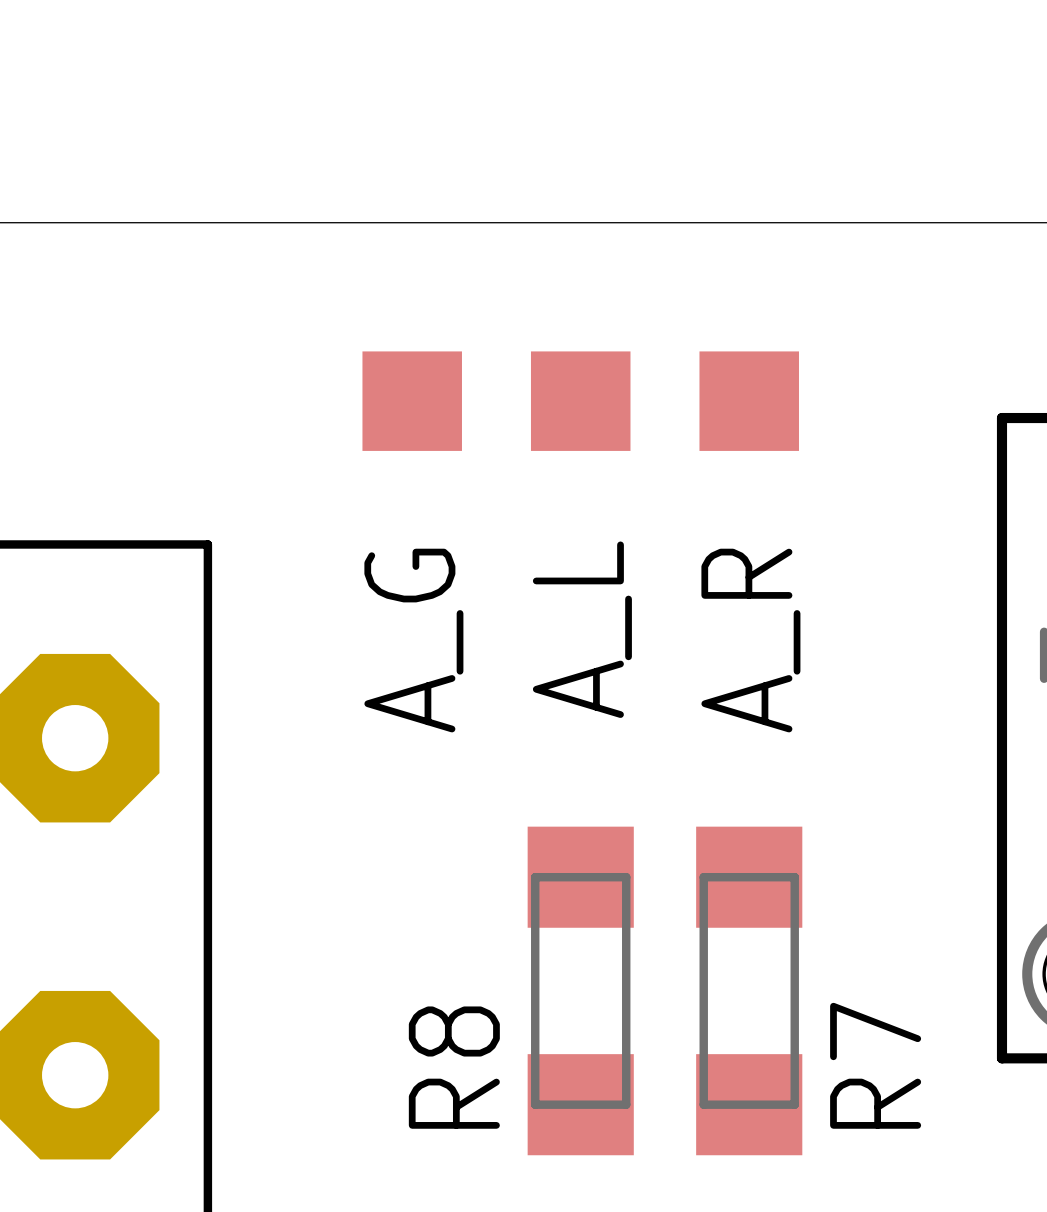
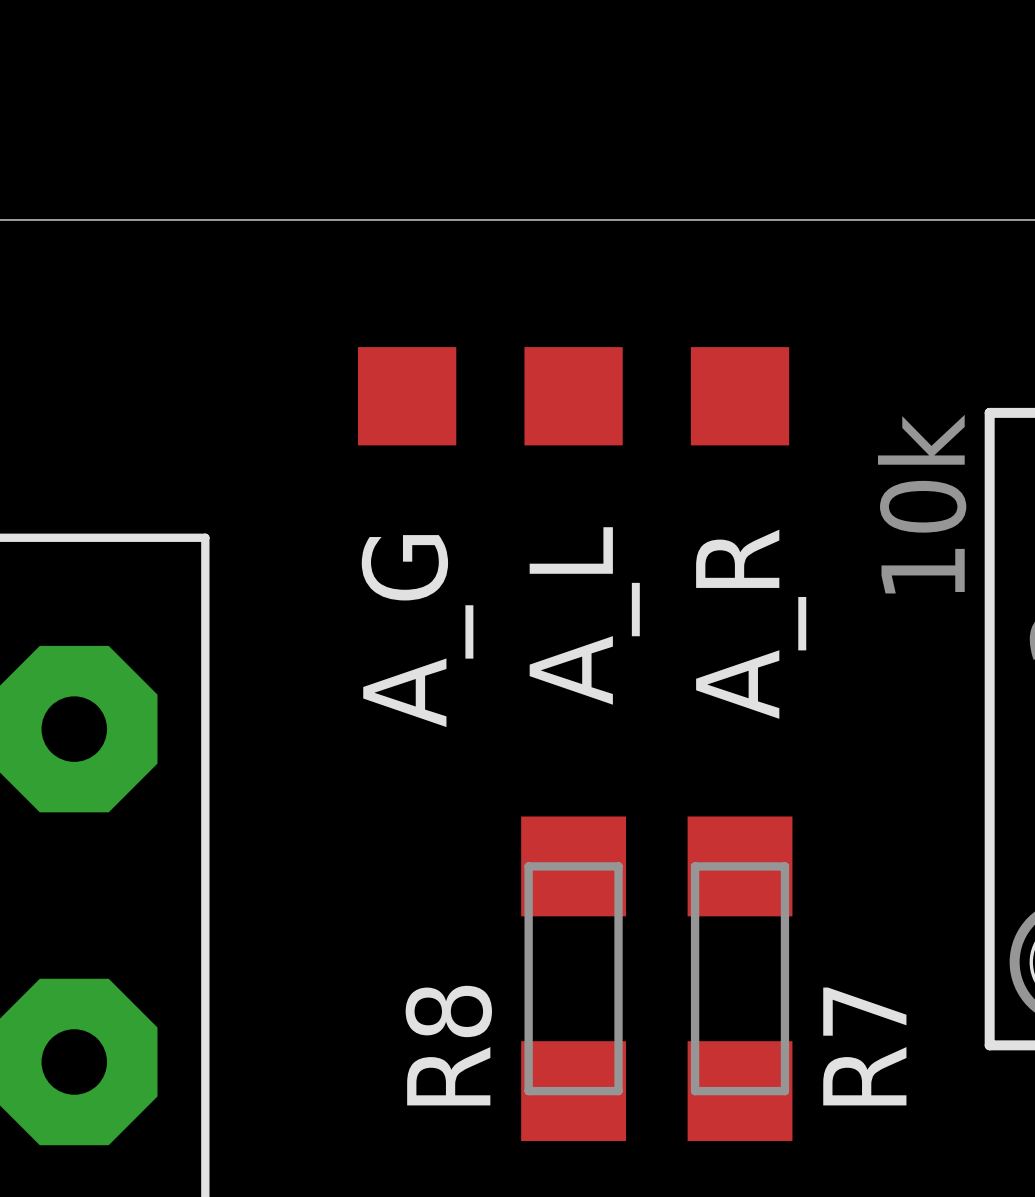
part value: none -> 10k (922, 504)

